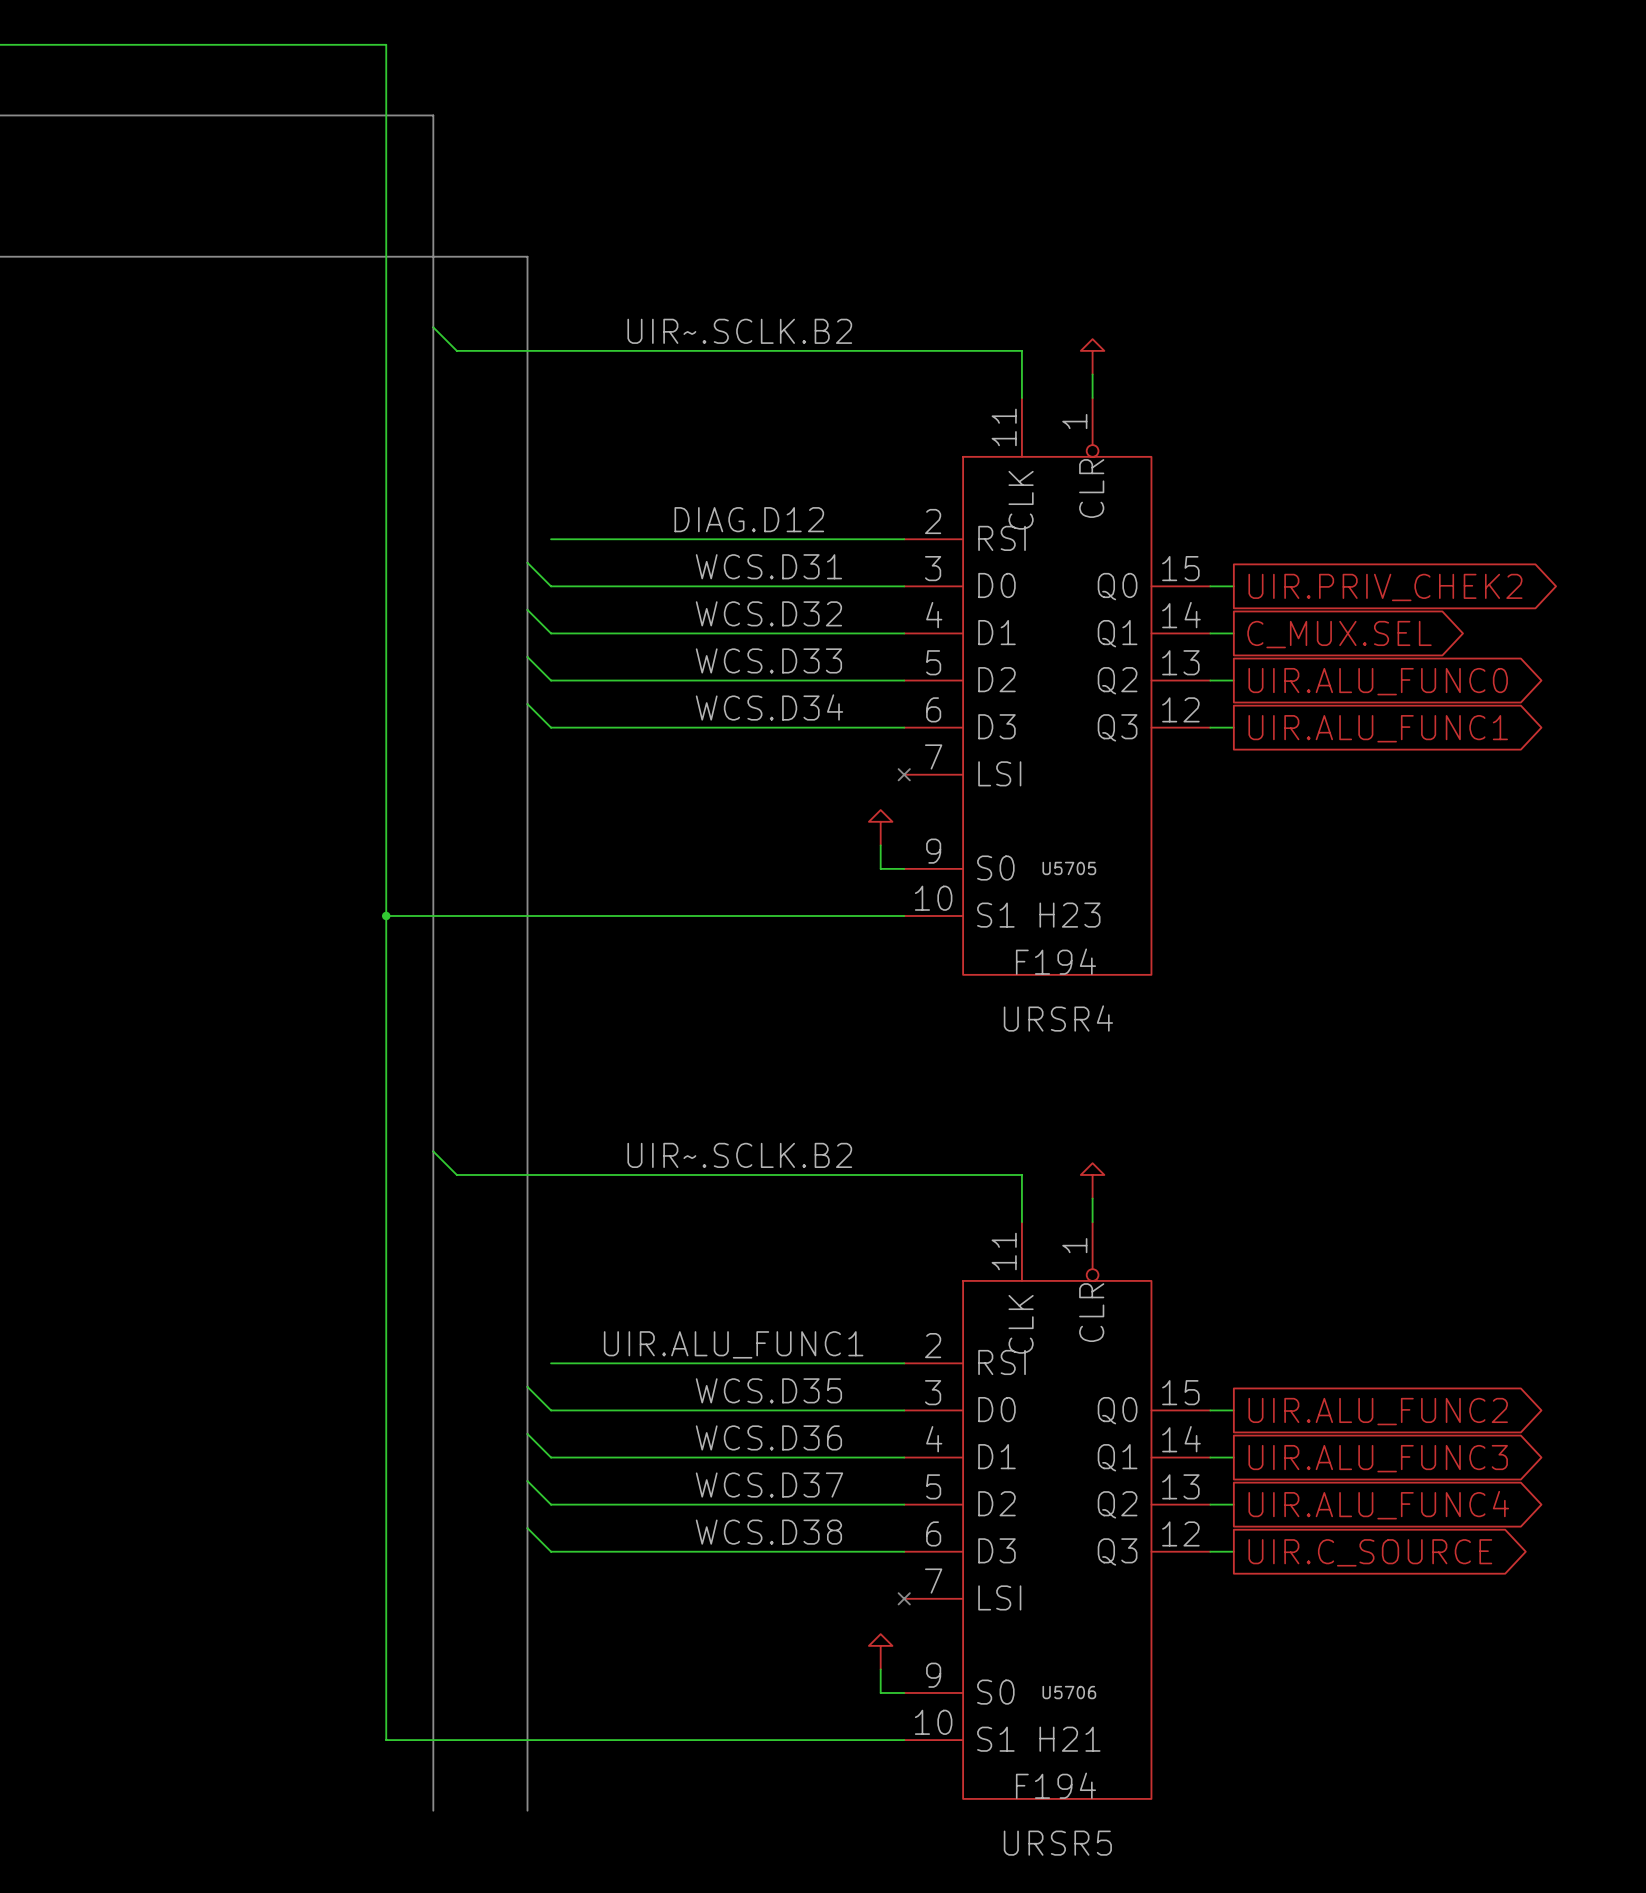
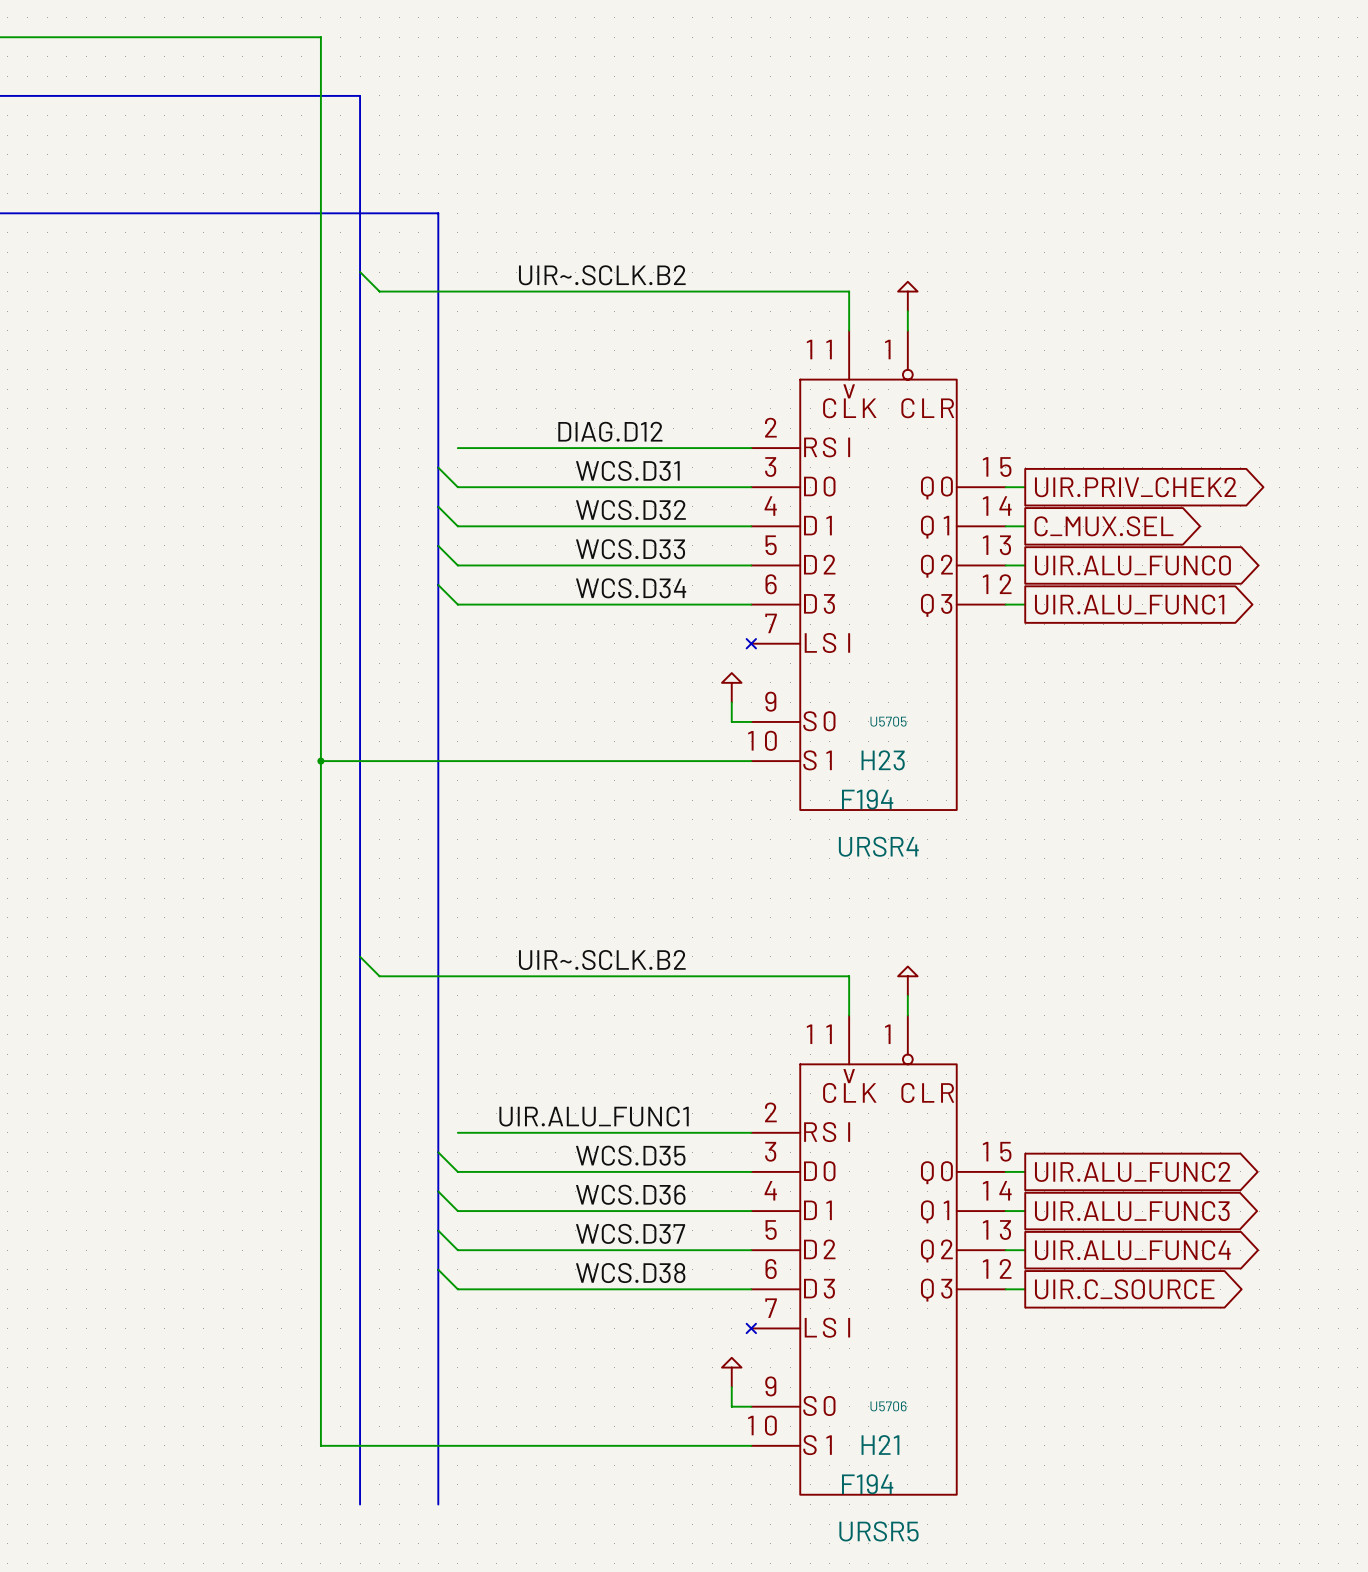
U5705 symbol: [904, 397, 1211, 975] -> [751, 330, 1006, 811]
U5706 symbol: [904, 1222, 1211, 1799] -> [751, 1015, 1006, 1495]

